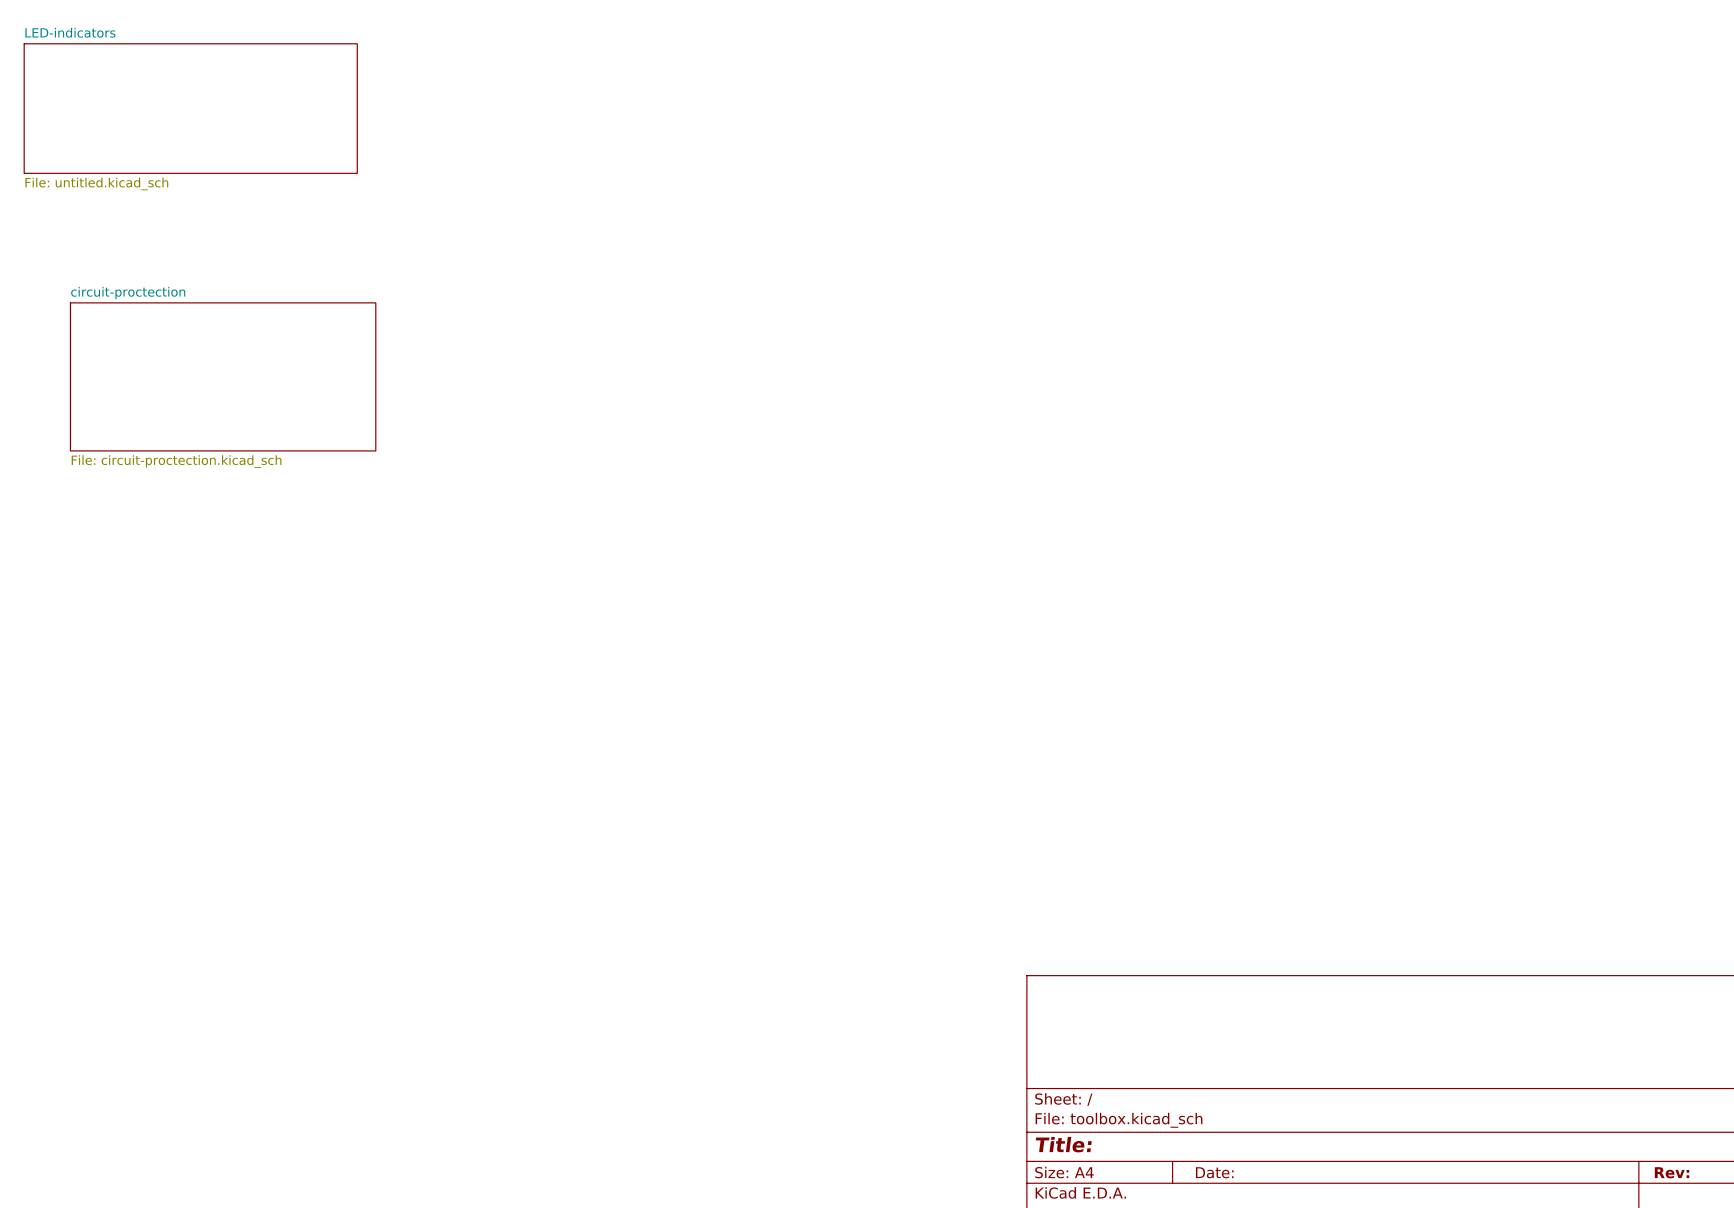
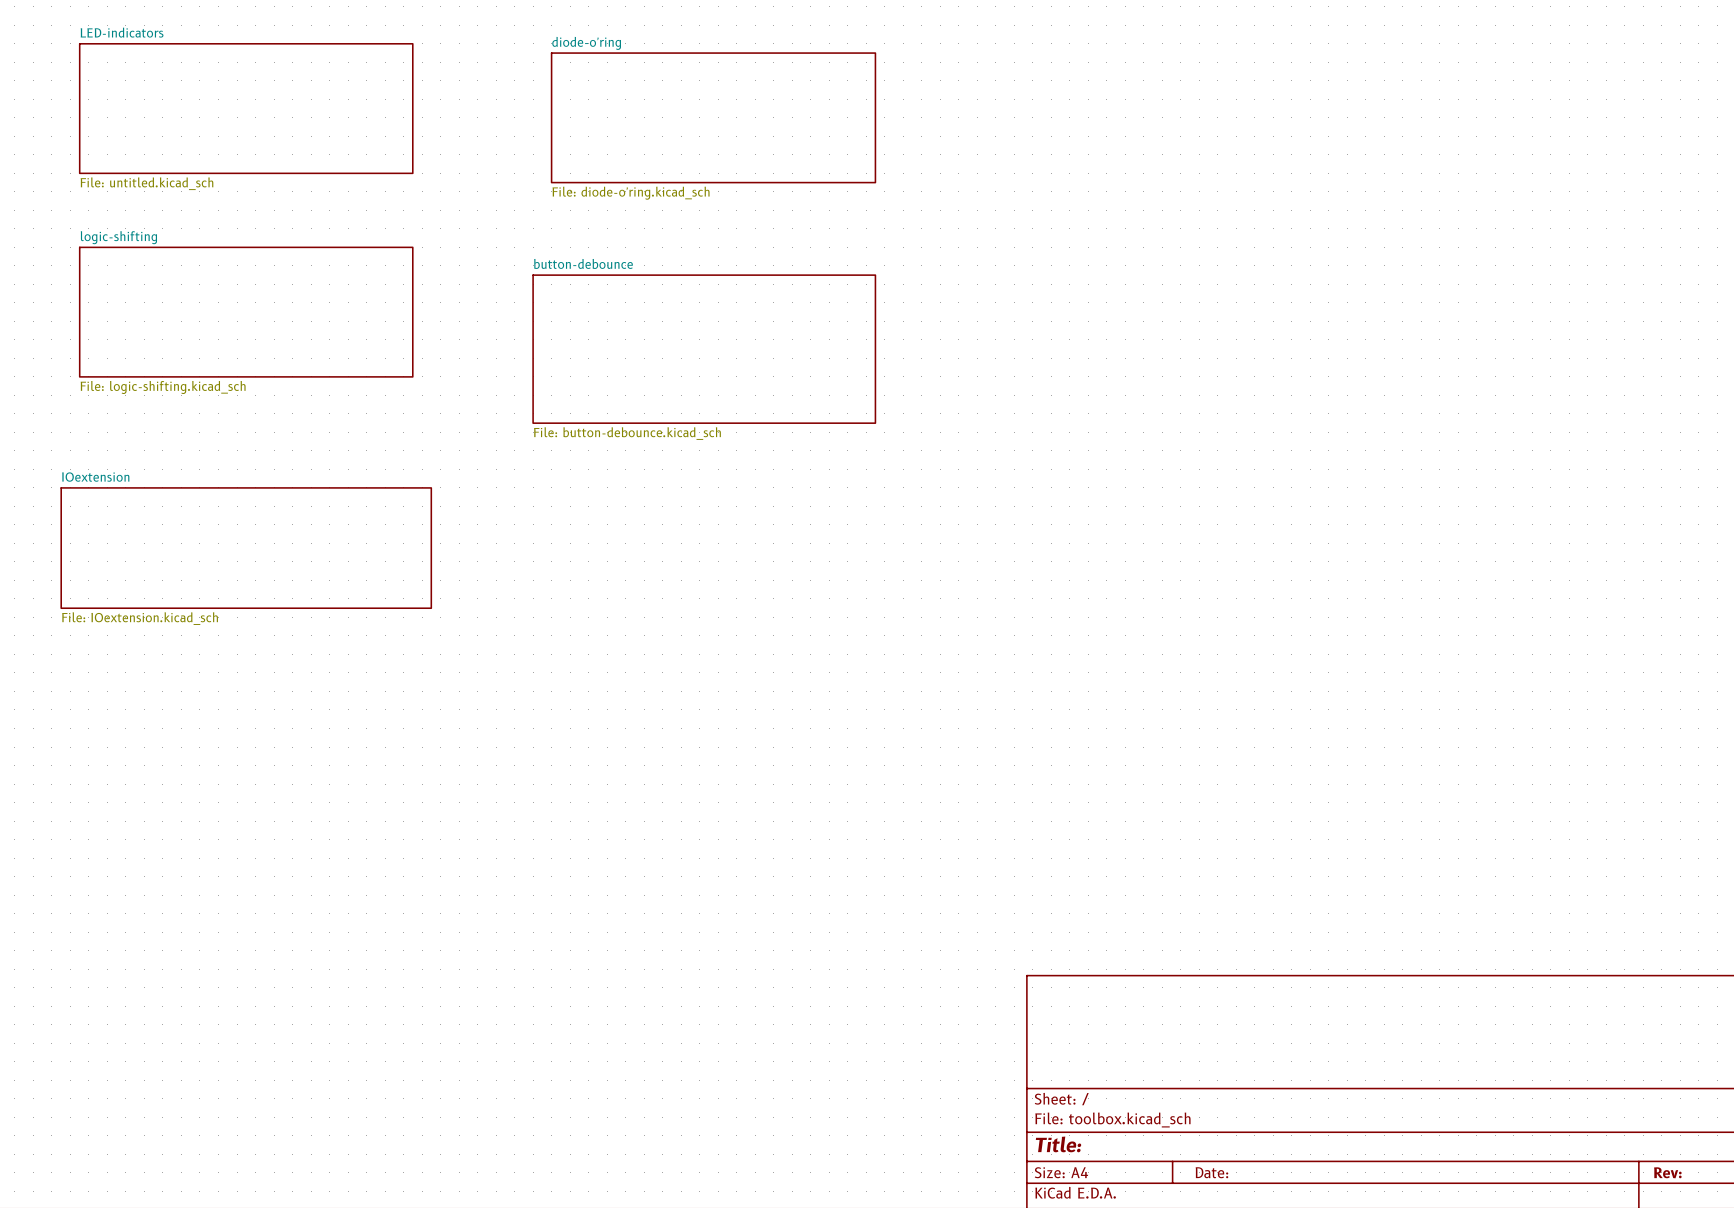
sheet LED-indicators position: (190, 108) -> (246, 108)
sheet diode-o'ring: none -> File: diode-o'ring.kicad_sch (713, 117)
sheet logic-shifting: none -> File: logic-shifting.kicad_sch (246, 312)
sheet button-debounce: none -> File: button-debounce.kicad_sch (704, 349)
sheet circuit-proctection: File: circuit-proctection.kicad_sch (223, 376) -> none
sheet IOextension: none -> File: IOextension.kicad_sch (246, 548)

